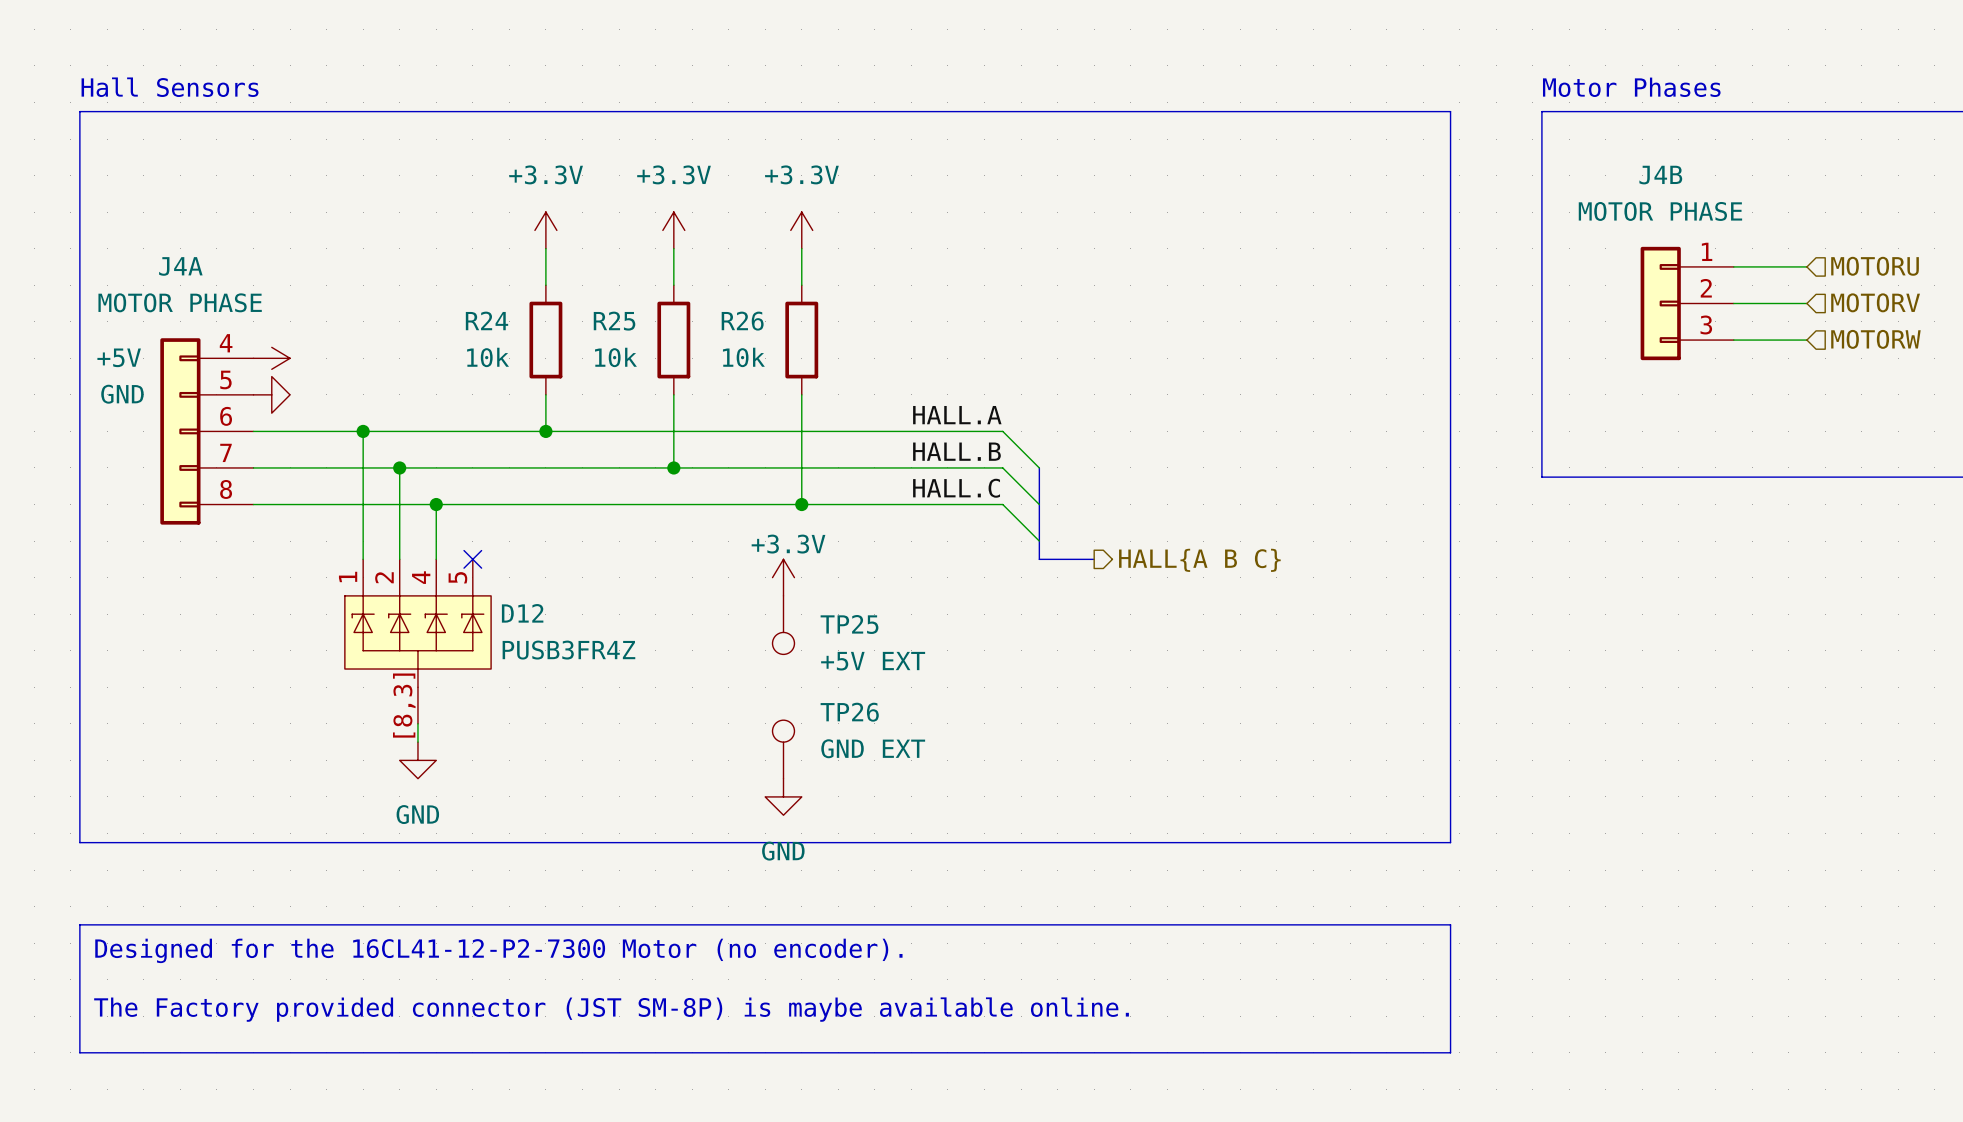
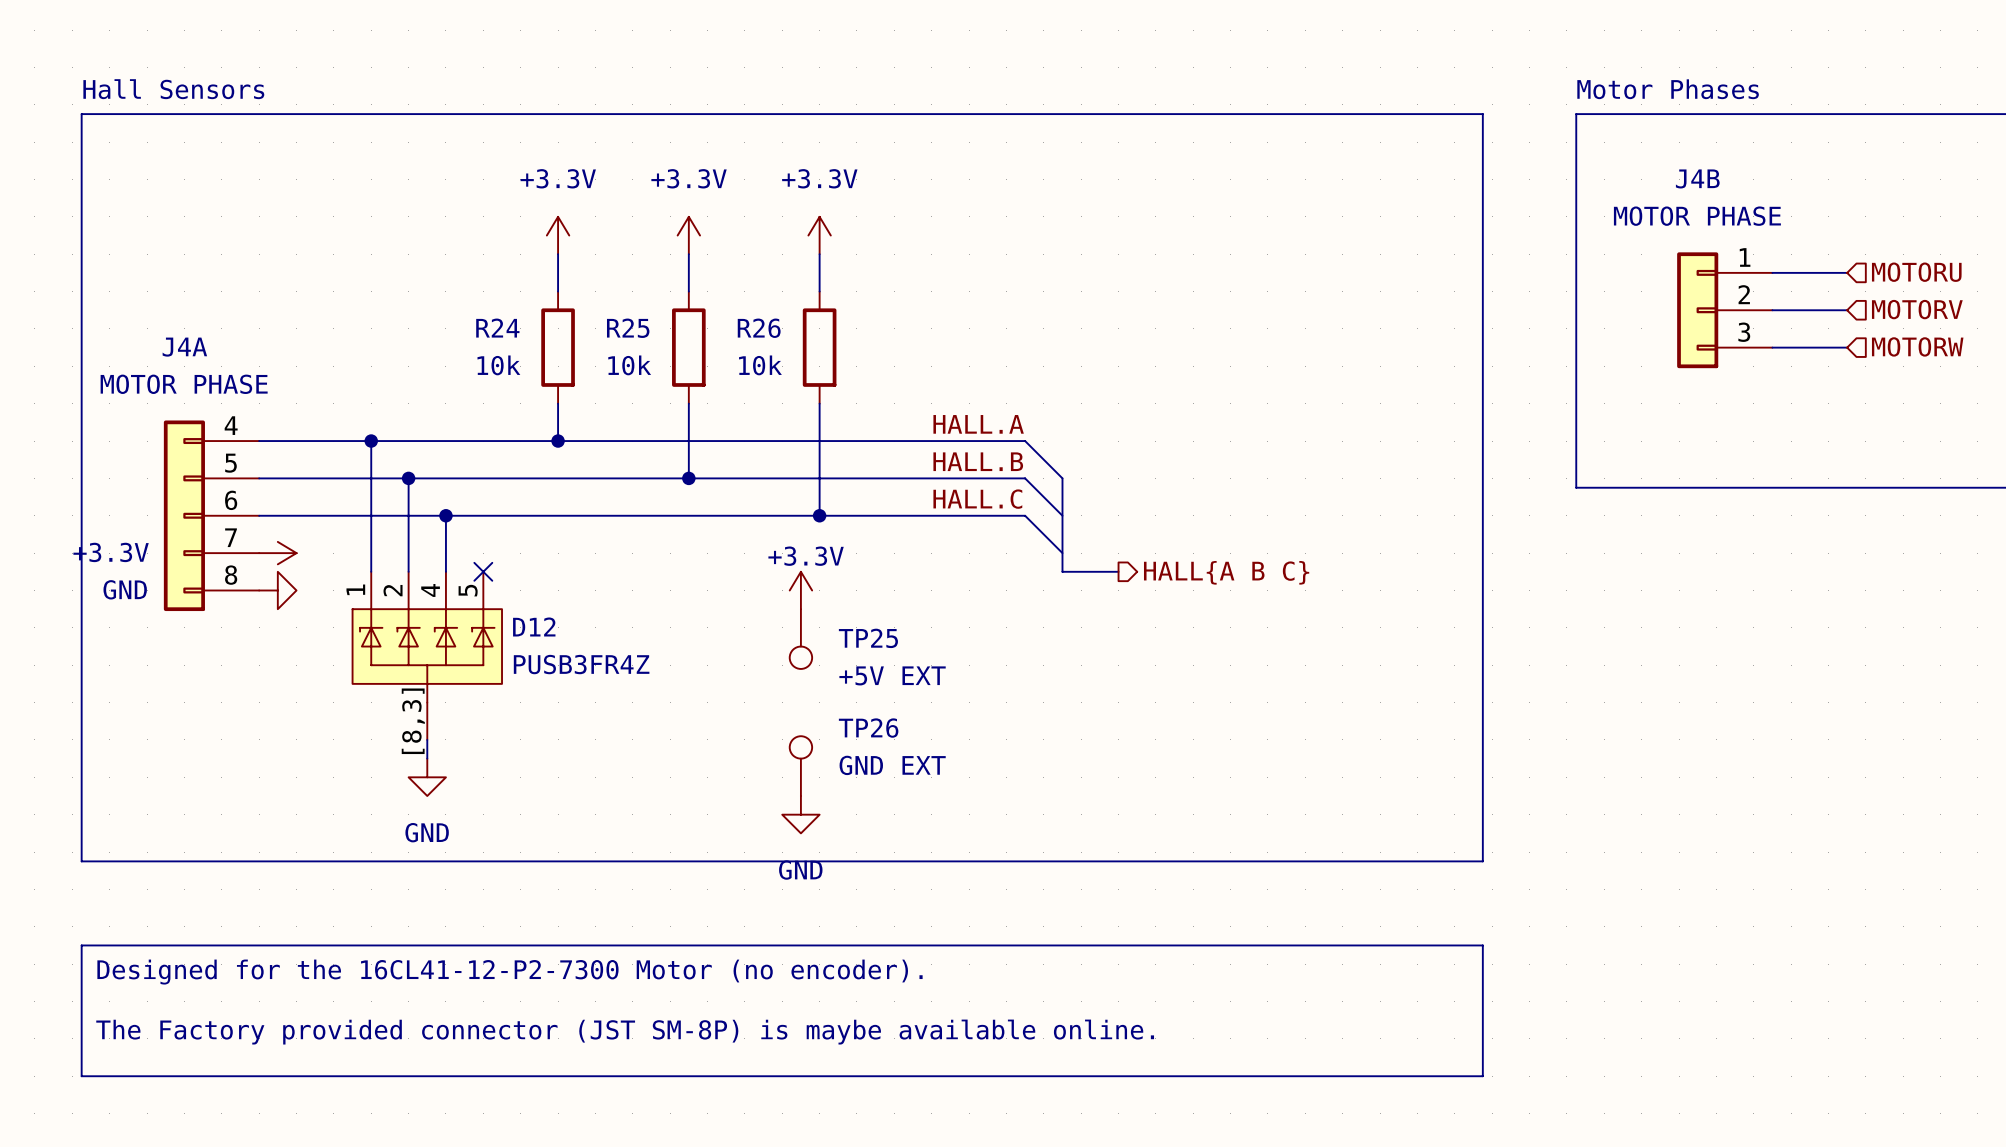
power symbol: +5V (271, 358) -> none
power symbol position: GND (271, 394) -> GND (277, 590)
J4A position: (206, 431) -> (211, 515)
power symbol: none -> +3.3V (277, 553)

